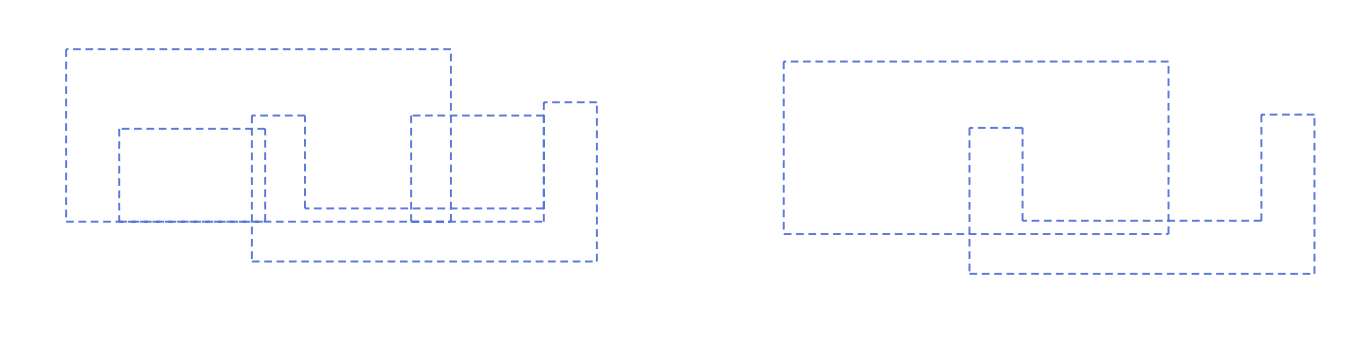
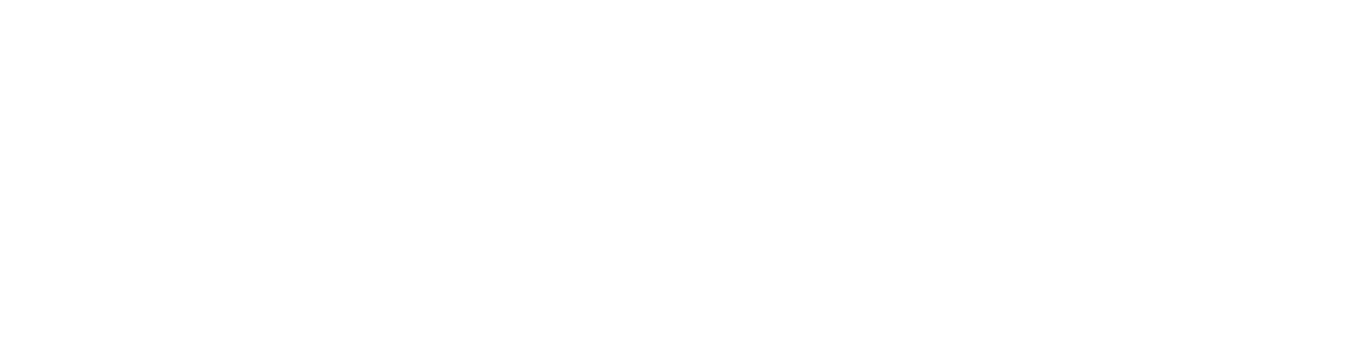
bottom zone outline: (1168, 61) (783, 61) (783, 234) (1168, 234) (1168, 61) -> none
bottom zone outline: (1314, 114) (1261, 114) (1261, 220) (1022, 220) (1022, 127) (969, 127) (969, 273) (1314, 273) (1314, 114) -> none
bottom zone outline: (543, 115) (411, 115) (411, 221) -> none
bottom zone outline: (543, 208) (304, 208) (304, 115) (251, 115) (251, 261) (596, 261) (596, 102) (543, 102) (543, 221) (66, 221) (66, 49) (450, 49) (450, 221) -> none
bottom zone outline: (265, 221) (265, 128) (119, 128) (119, 221) -> none

